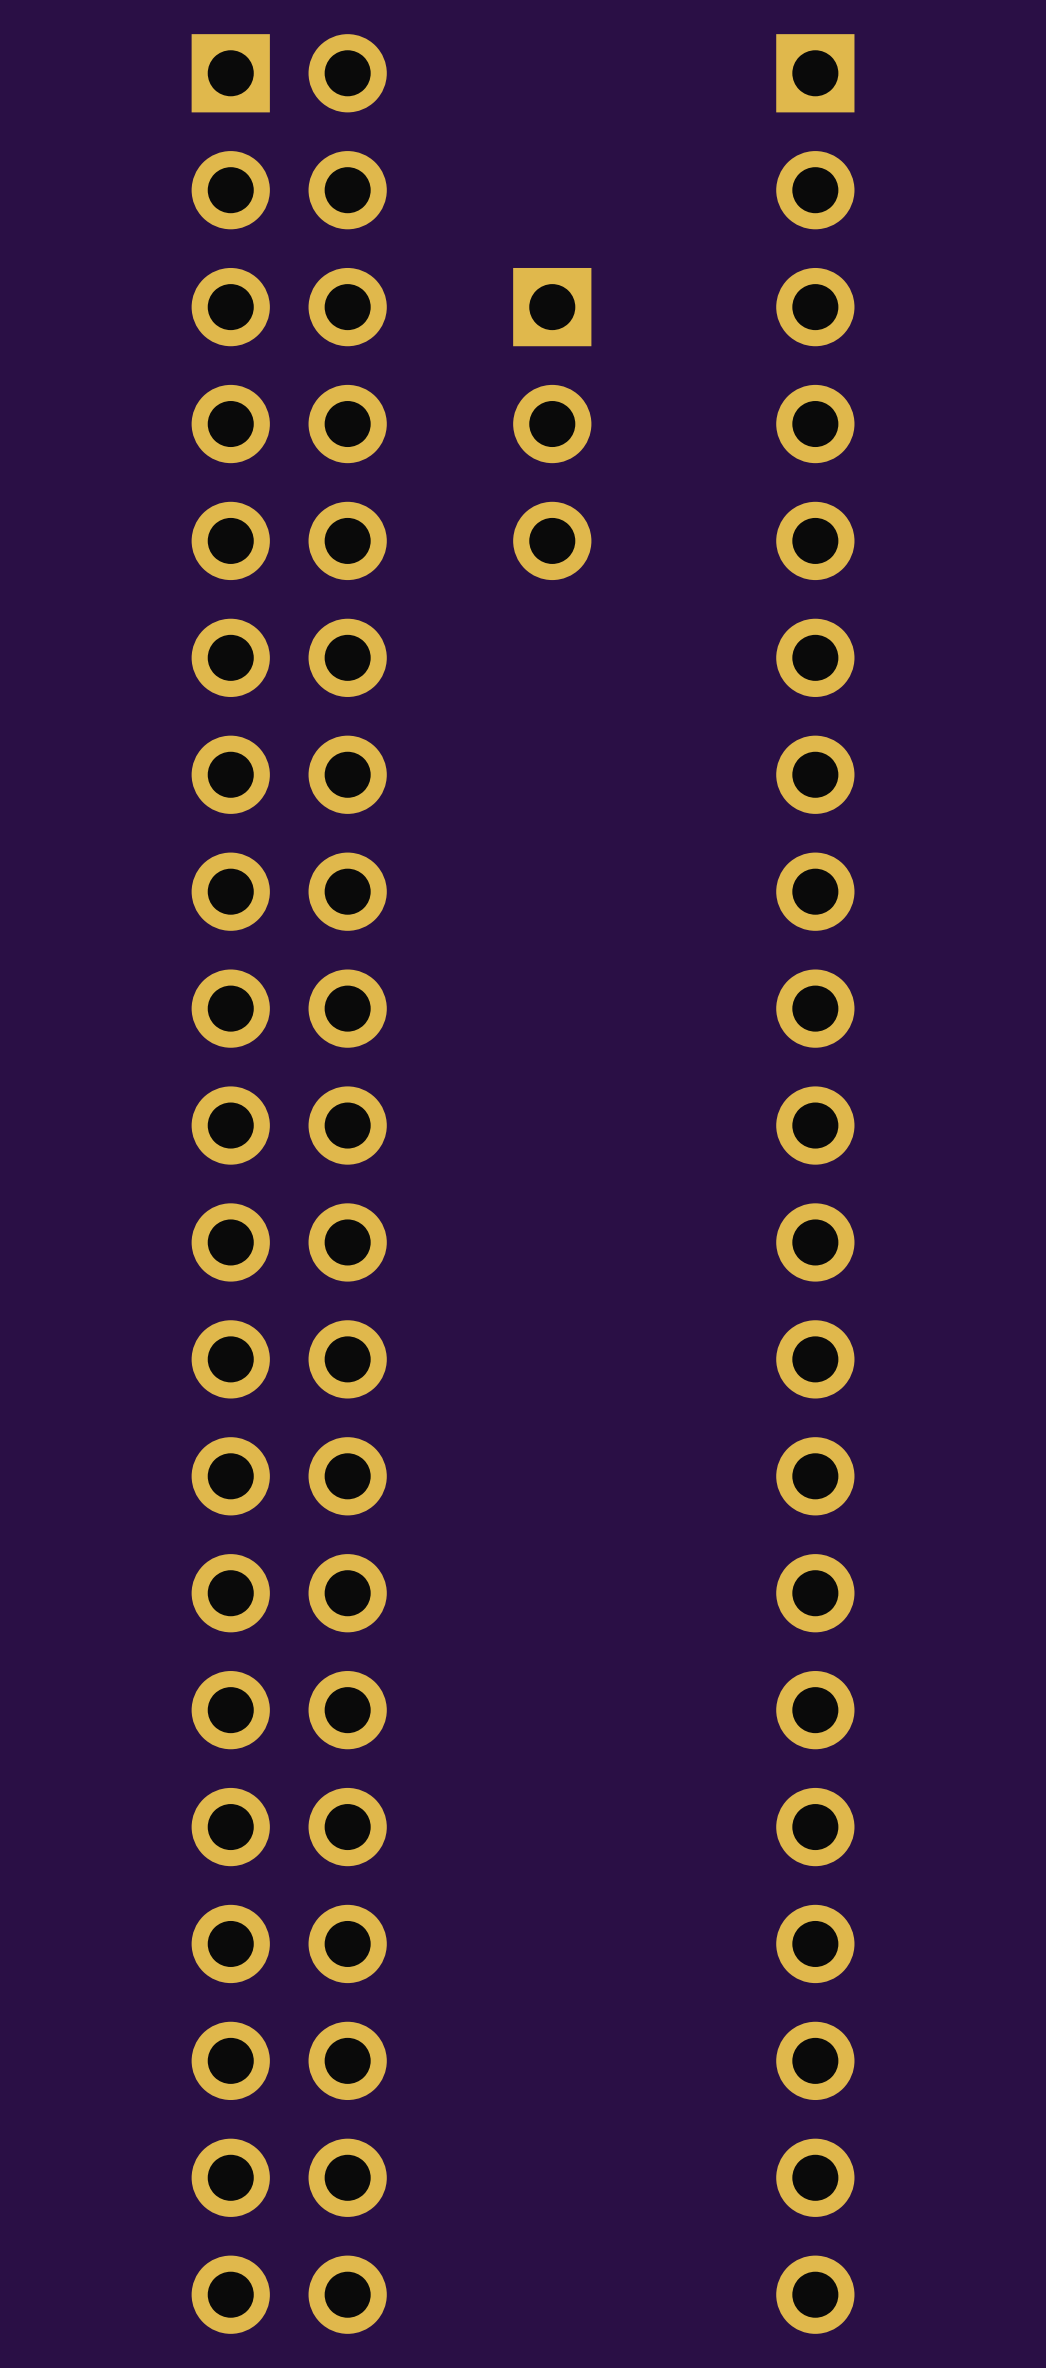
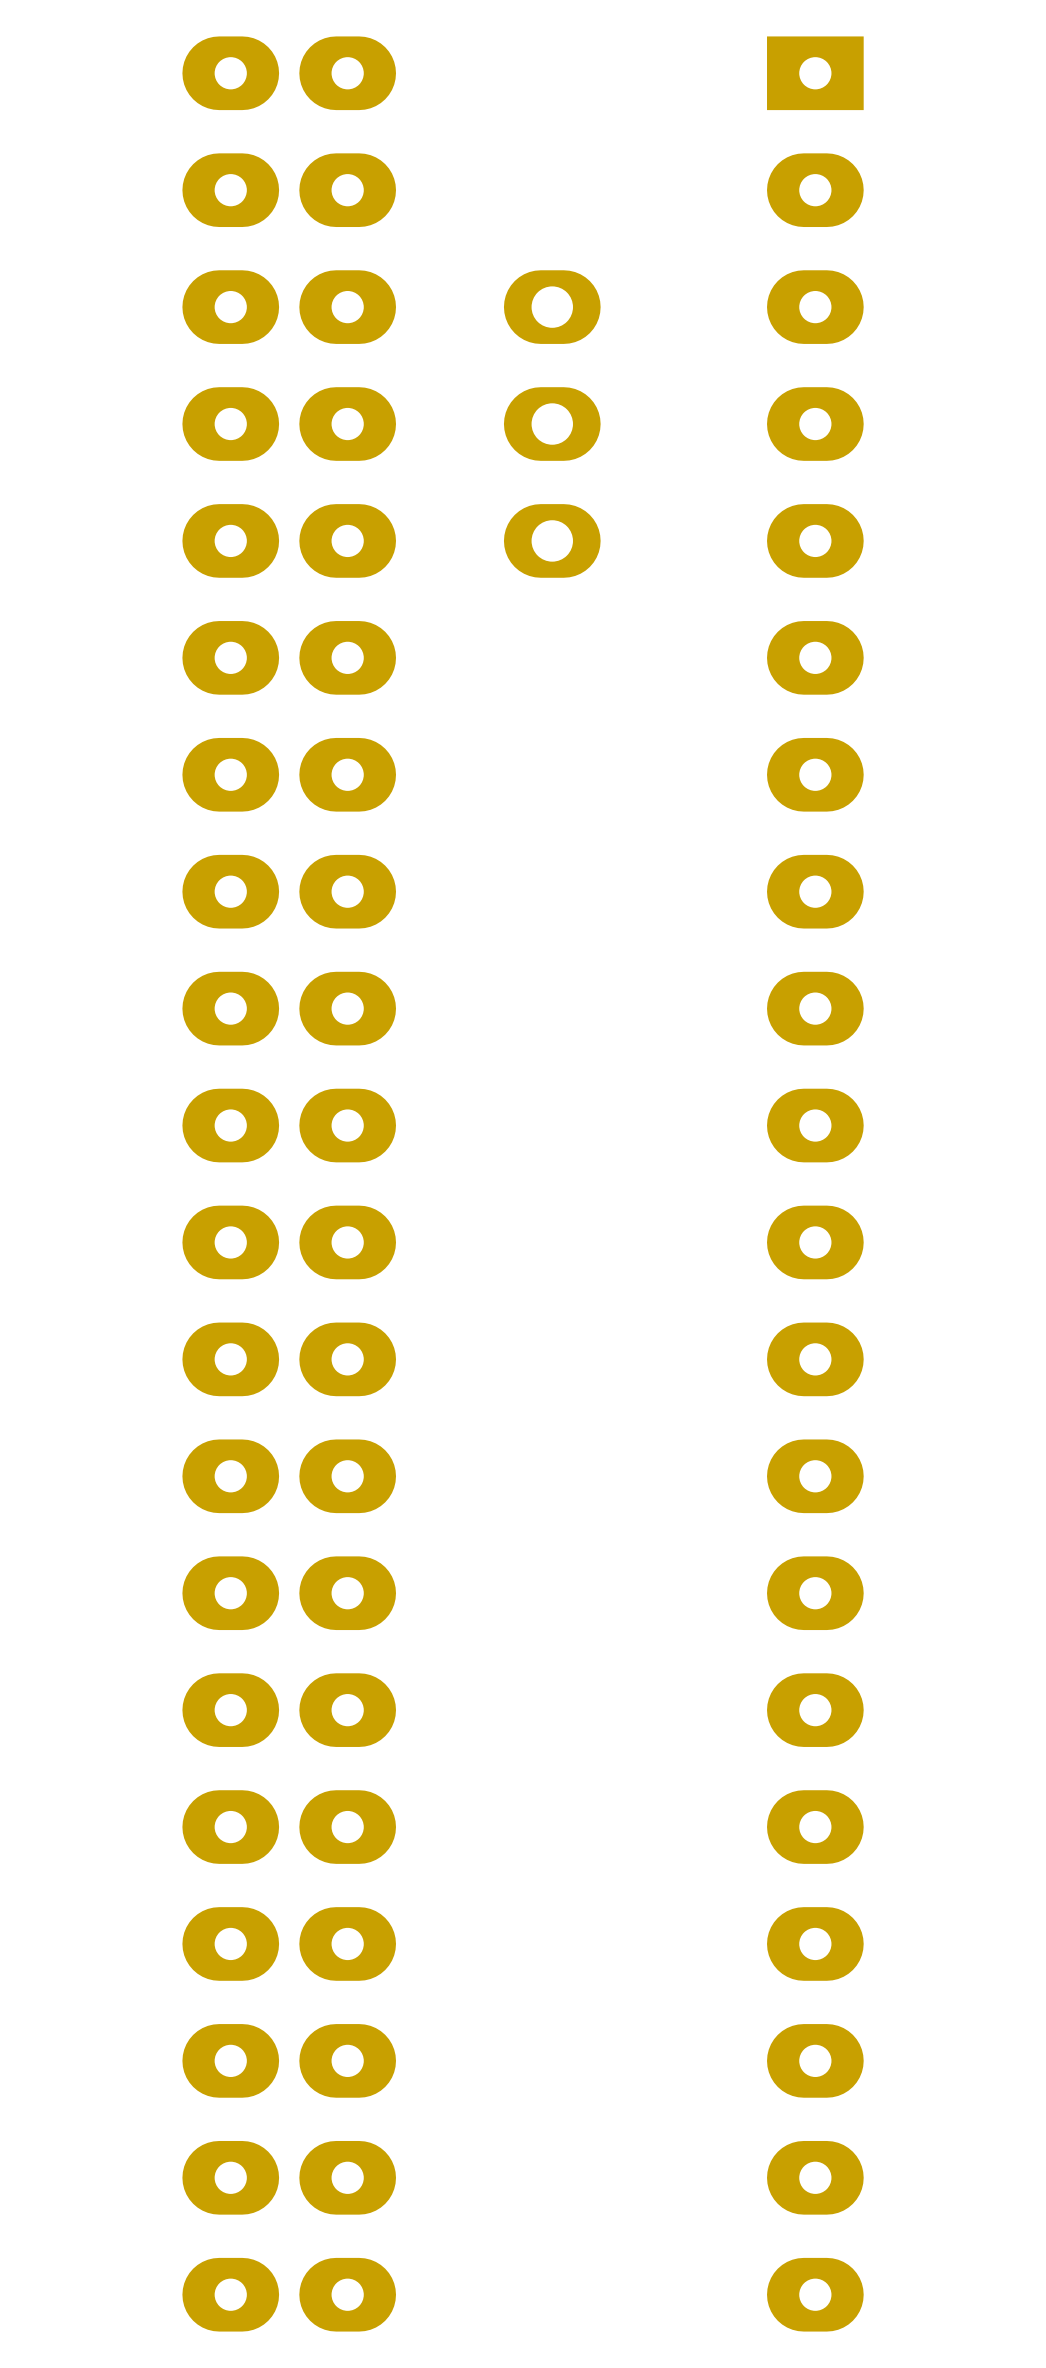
part footprint: [191, 34, 387, 2334] -> [182, 36, 397, 2332]
part footprint: [776, 34, 855, 2334] -> [767, 36, 864, 2332]
part footprint: [513, 267, 592, 581] -> [503, 270, 601, 578]

